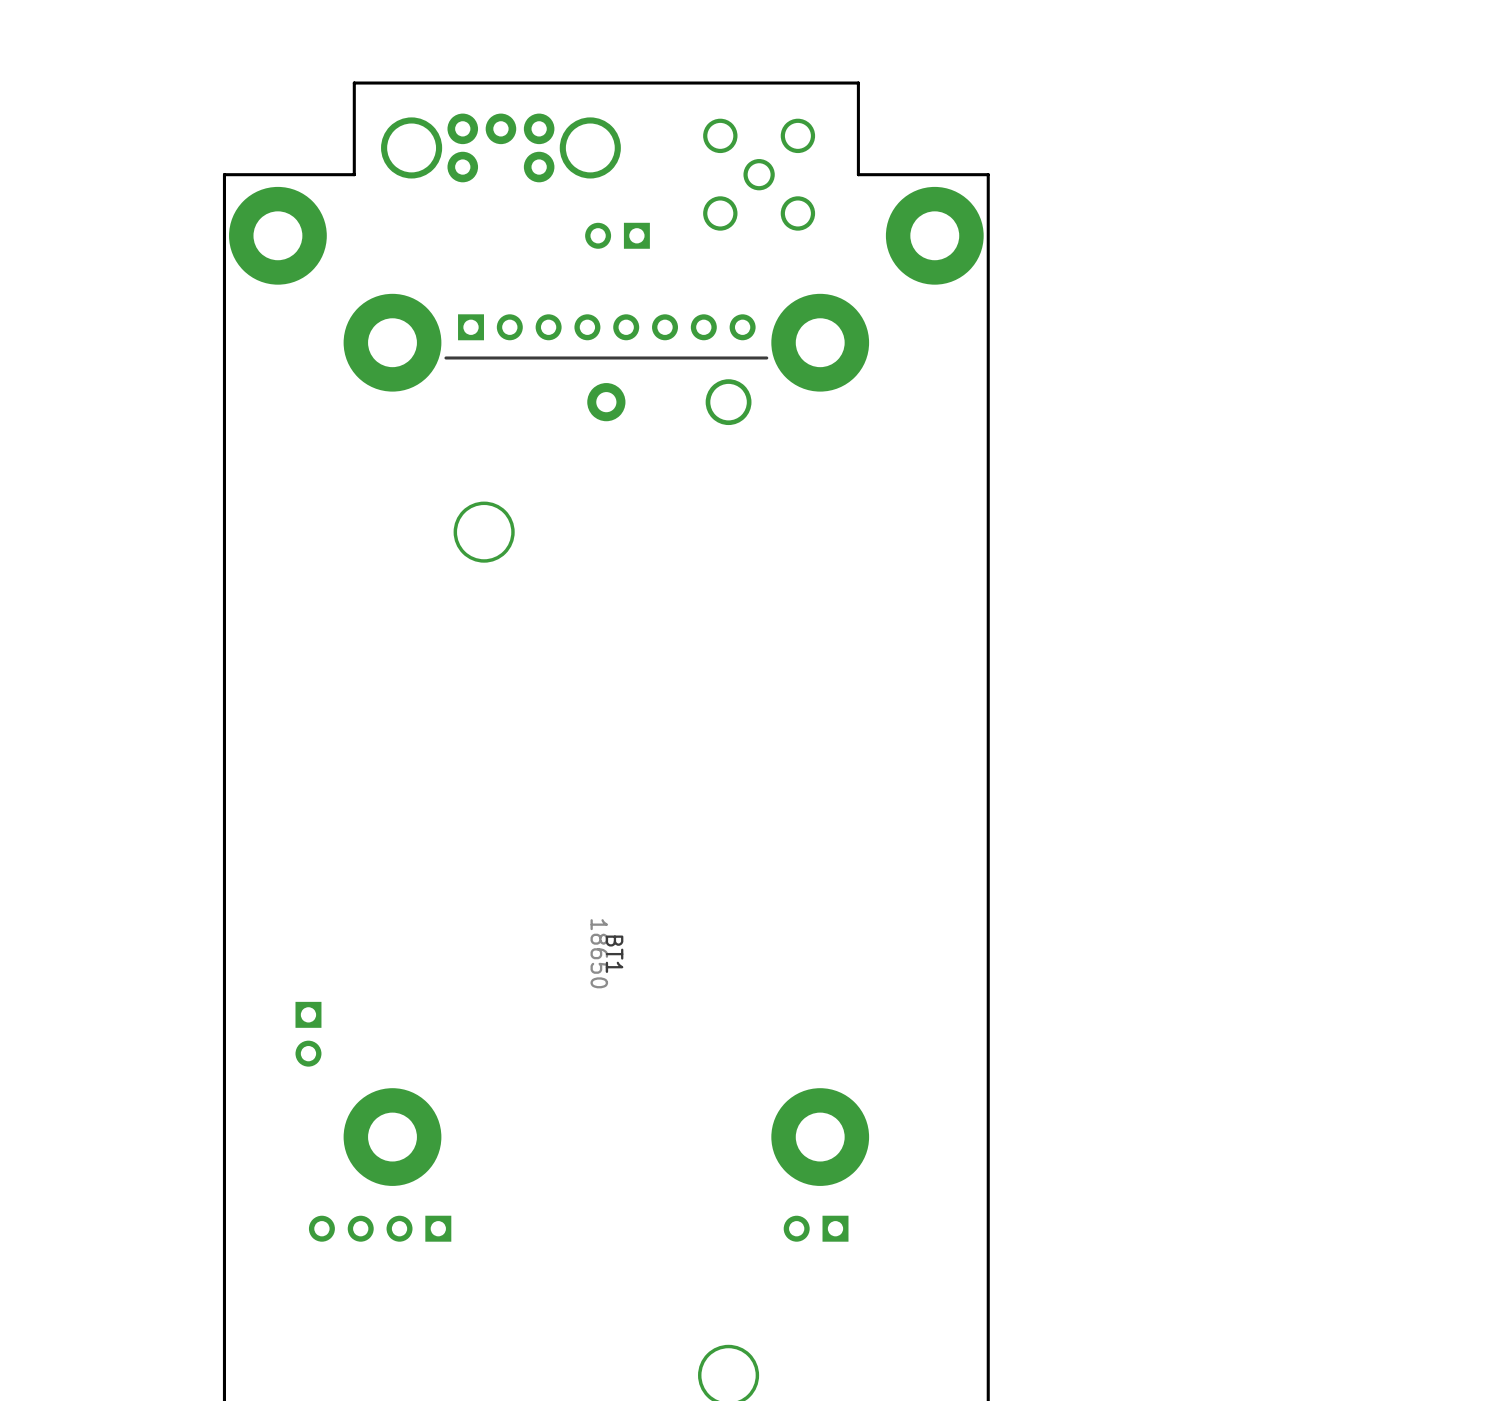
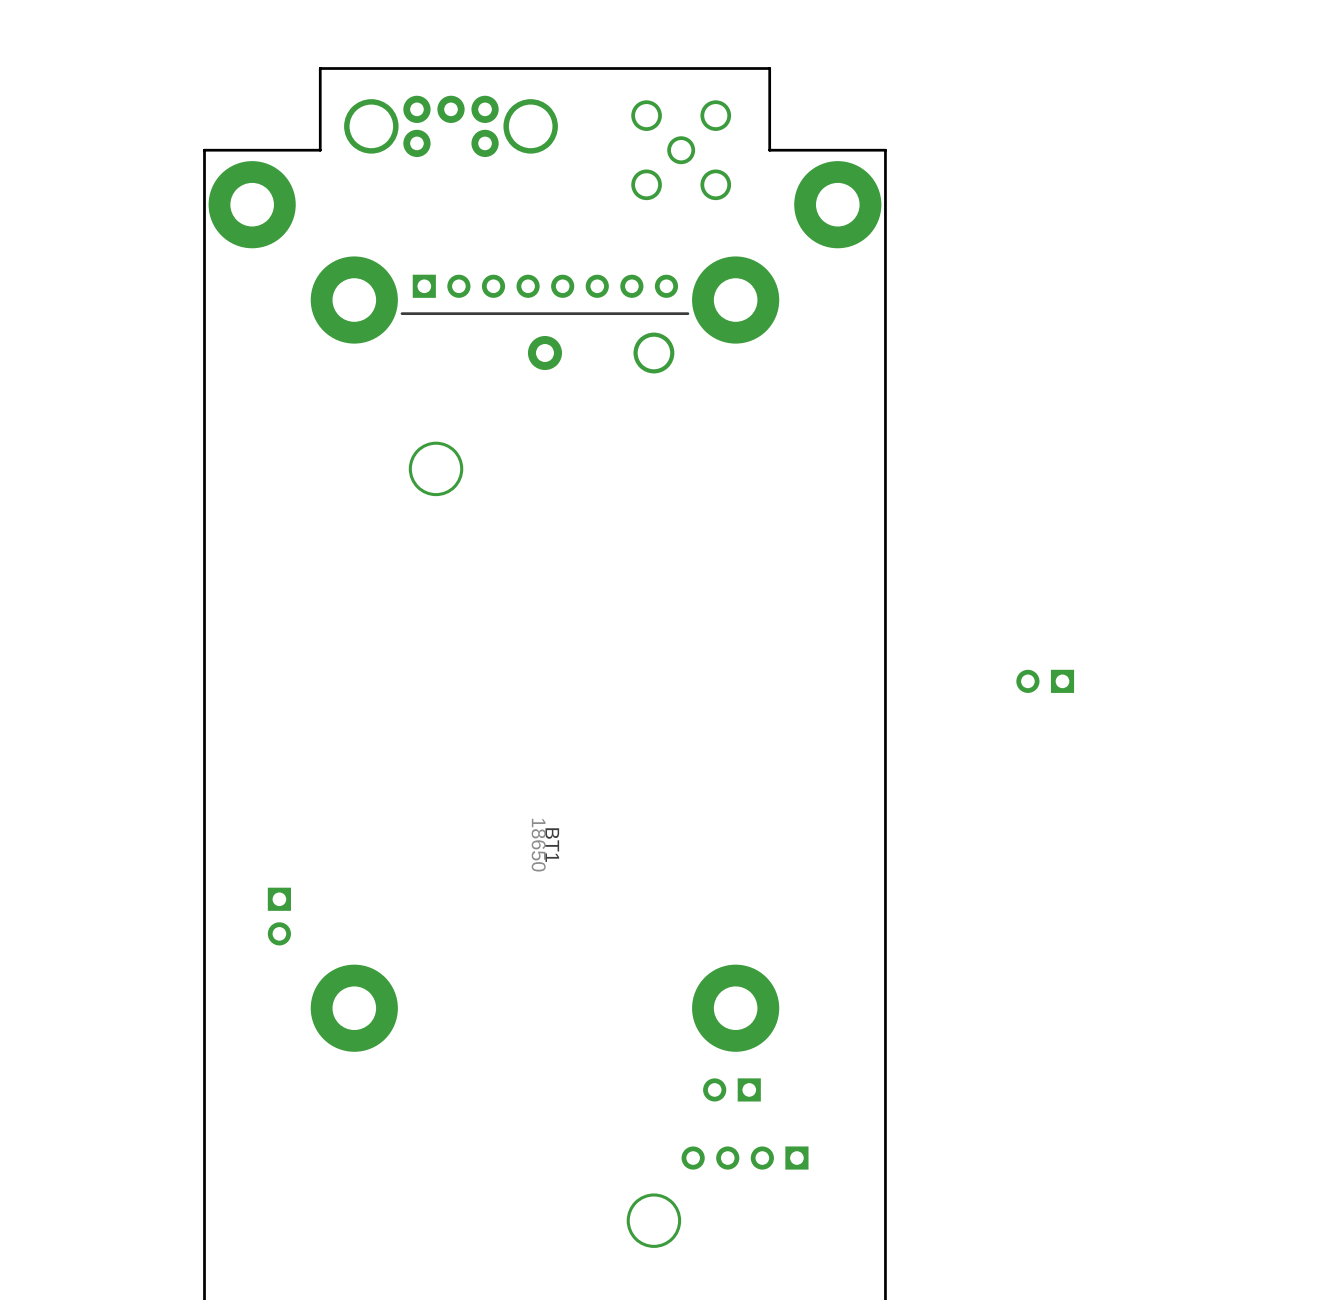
part: (617, 235) -> none
part: none -> (1045, 681)
part: (380, 1228) -> none
part: none -> (745, 1158)

